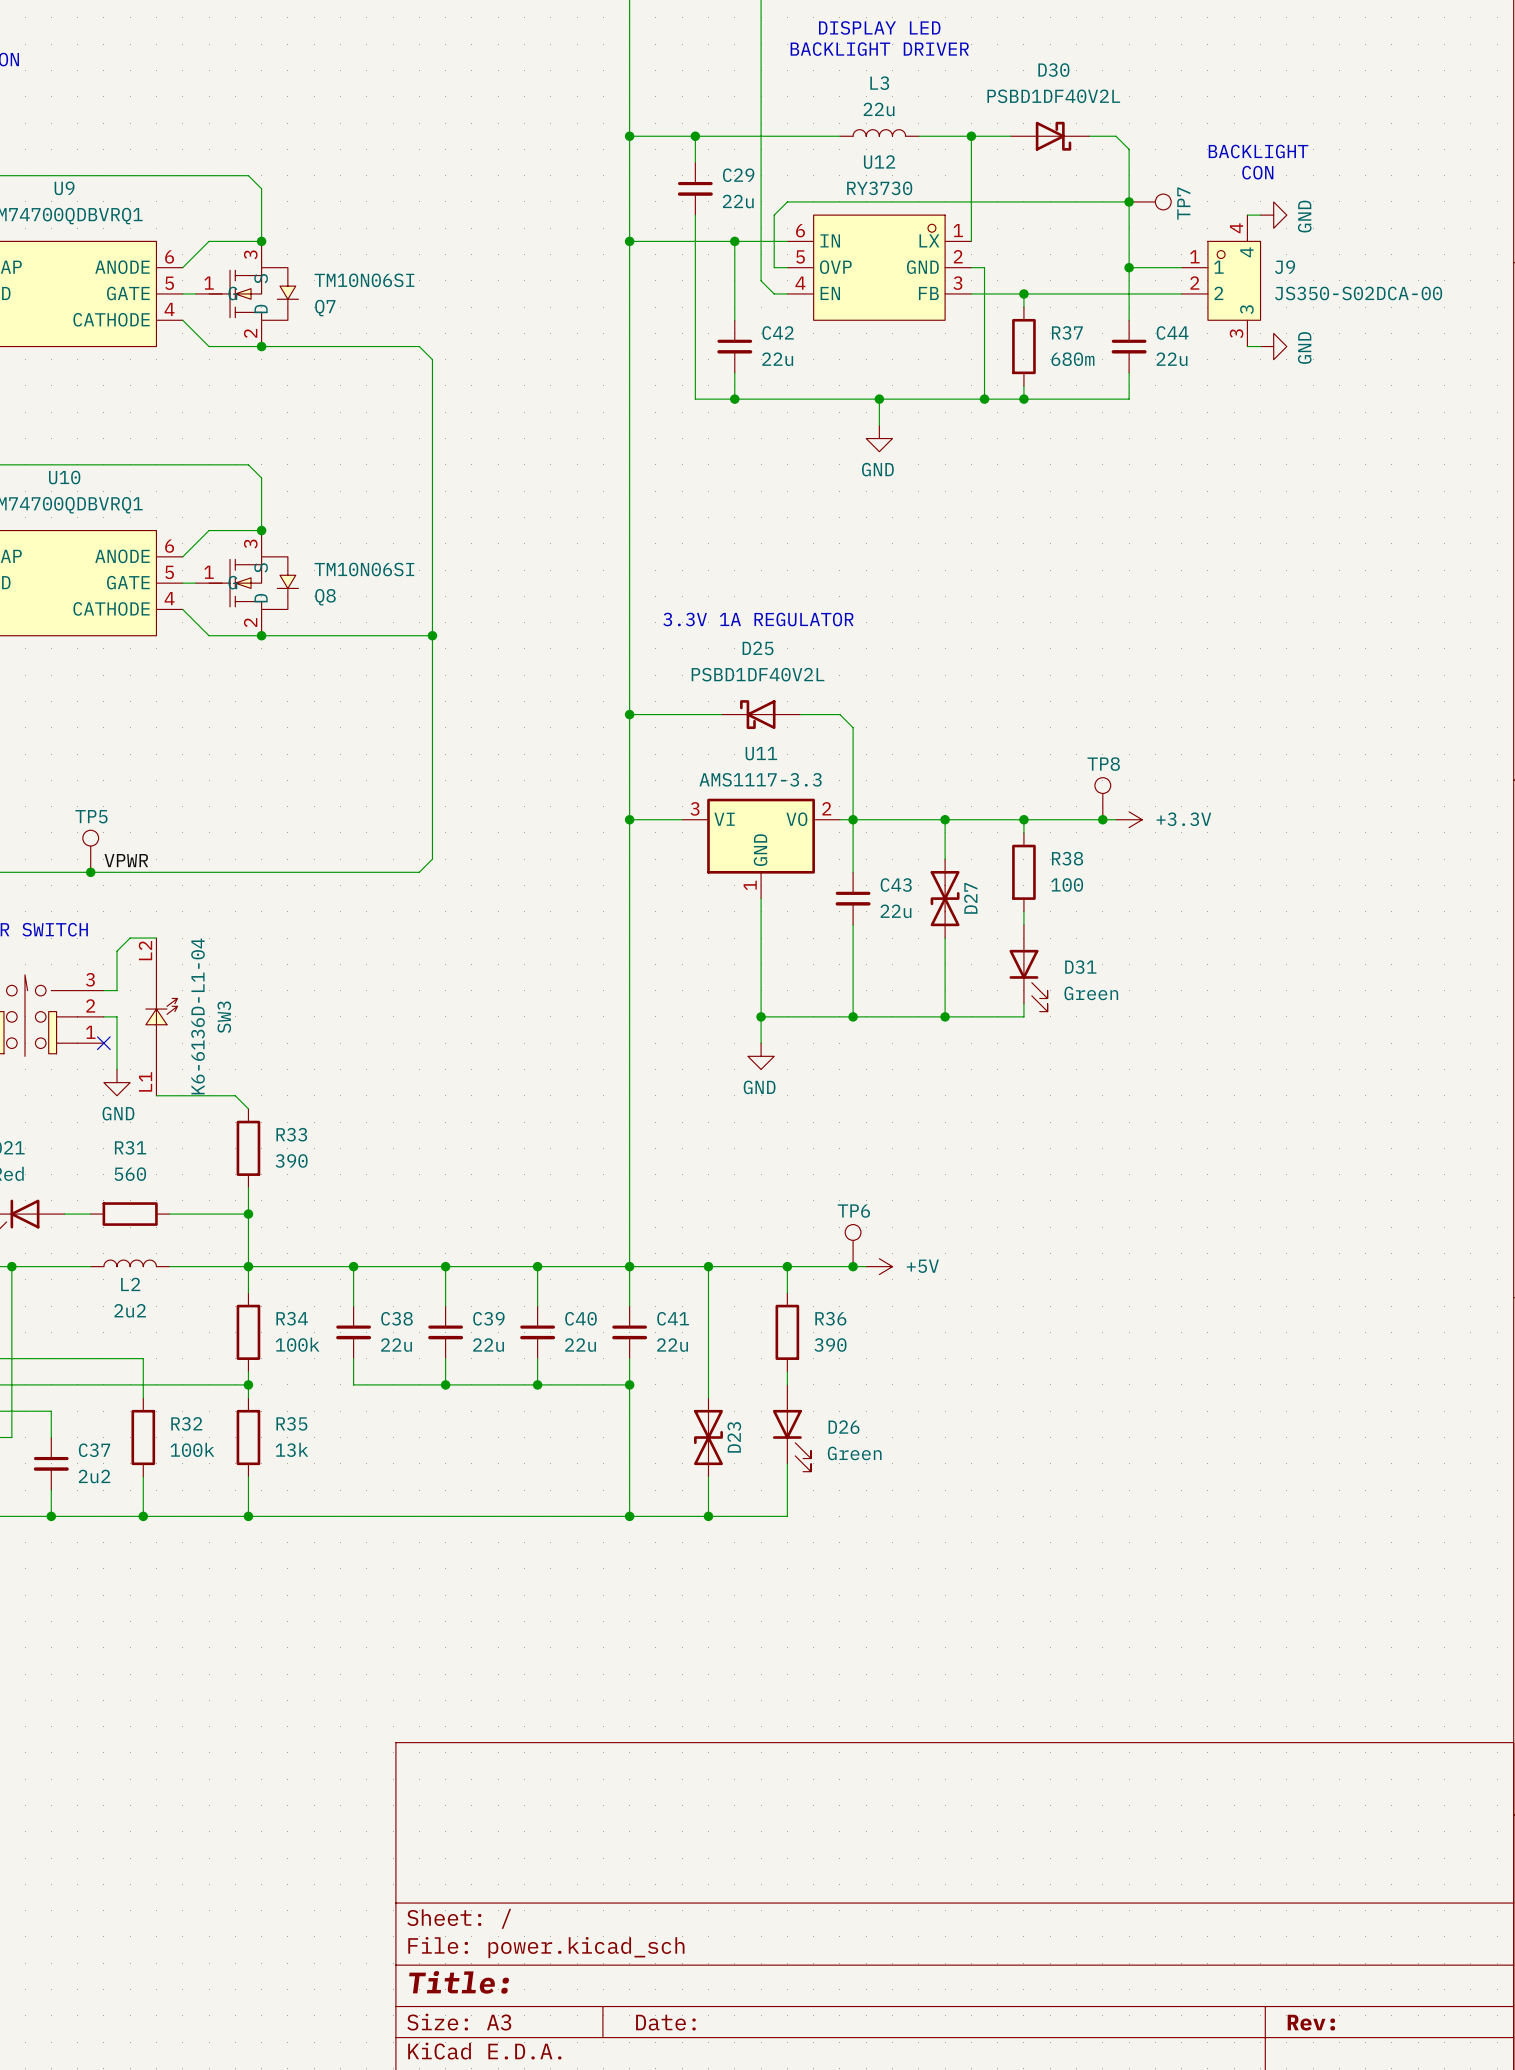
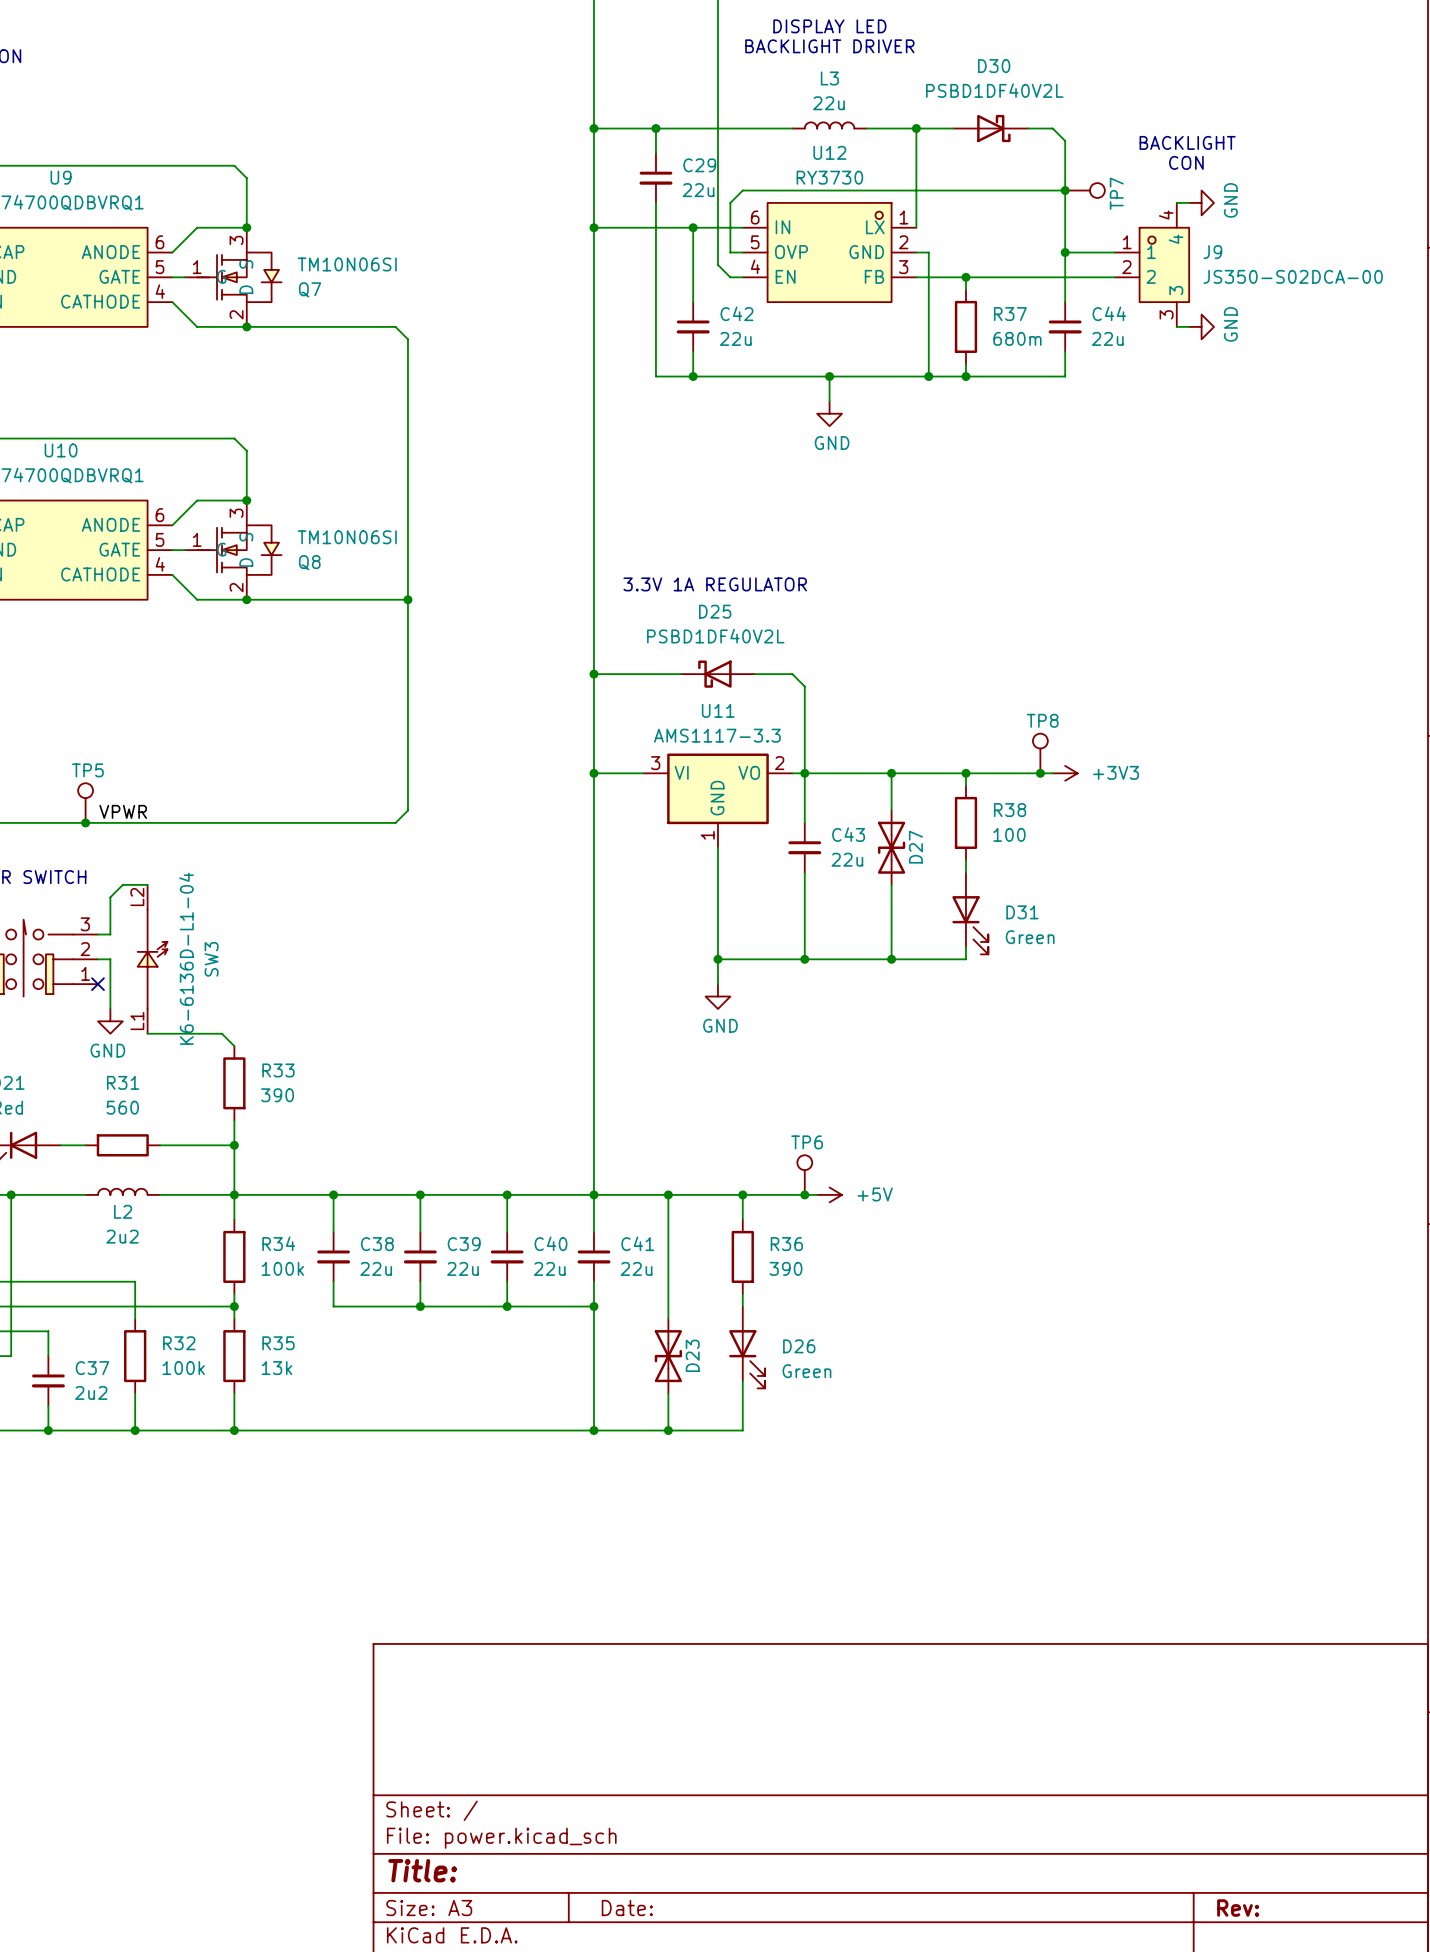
power symbol: +3.3V (1129, 819) -> +3V3 (1065, 773)

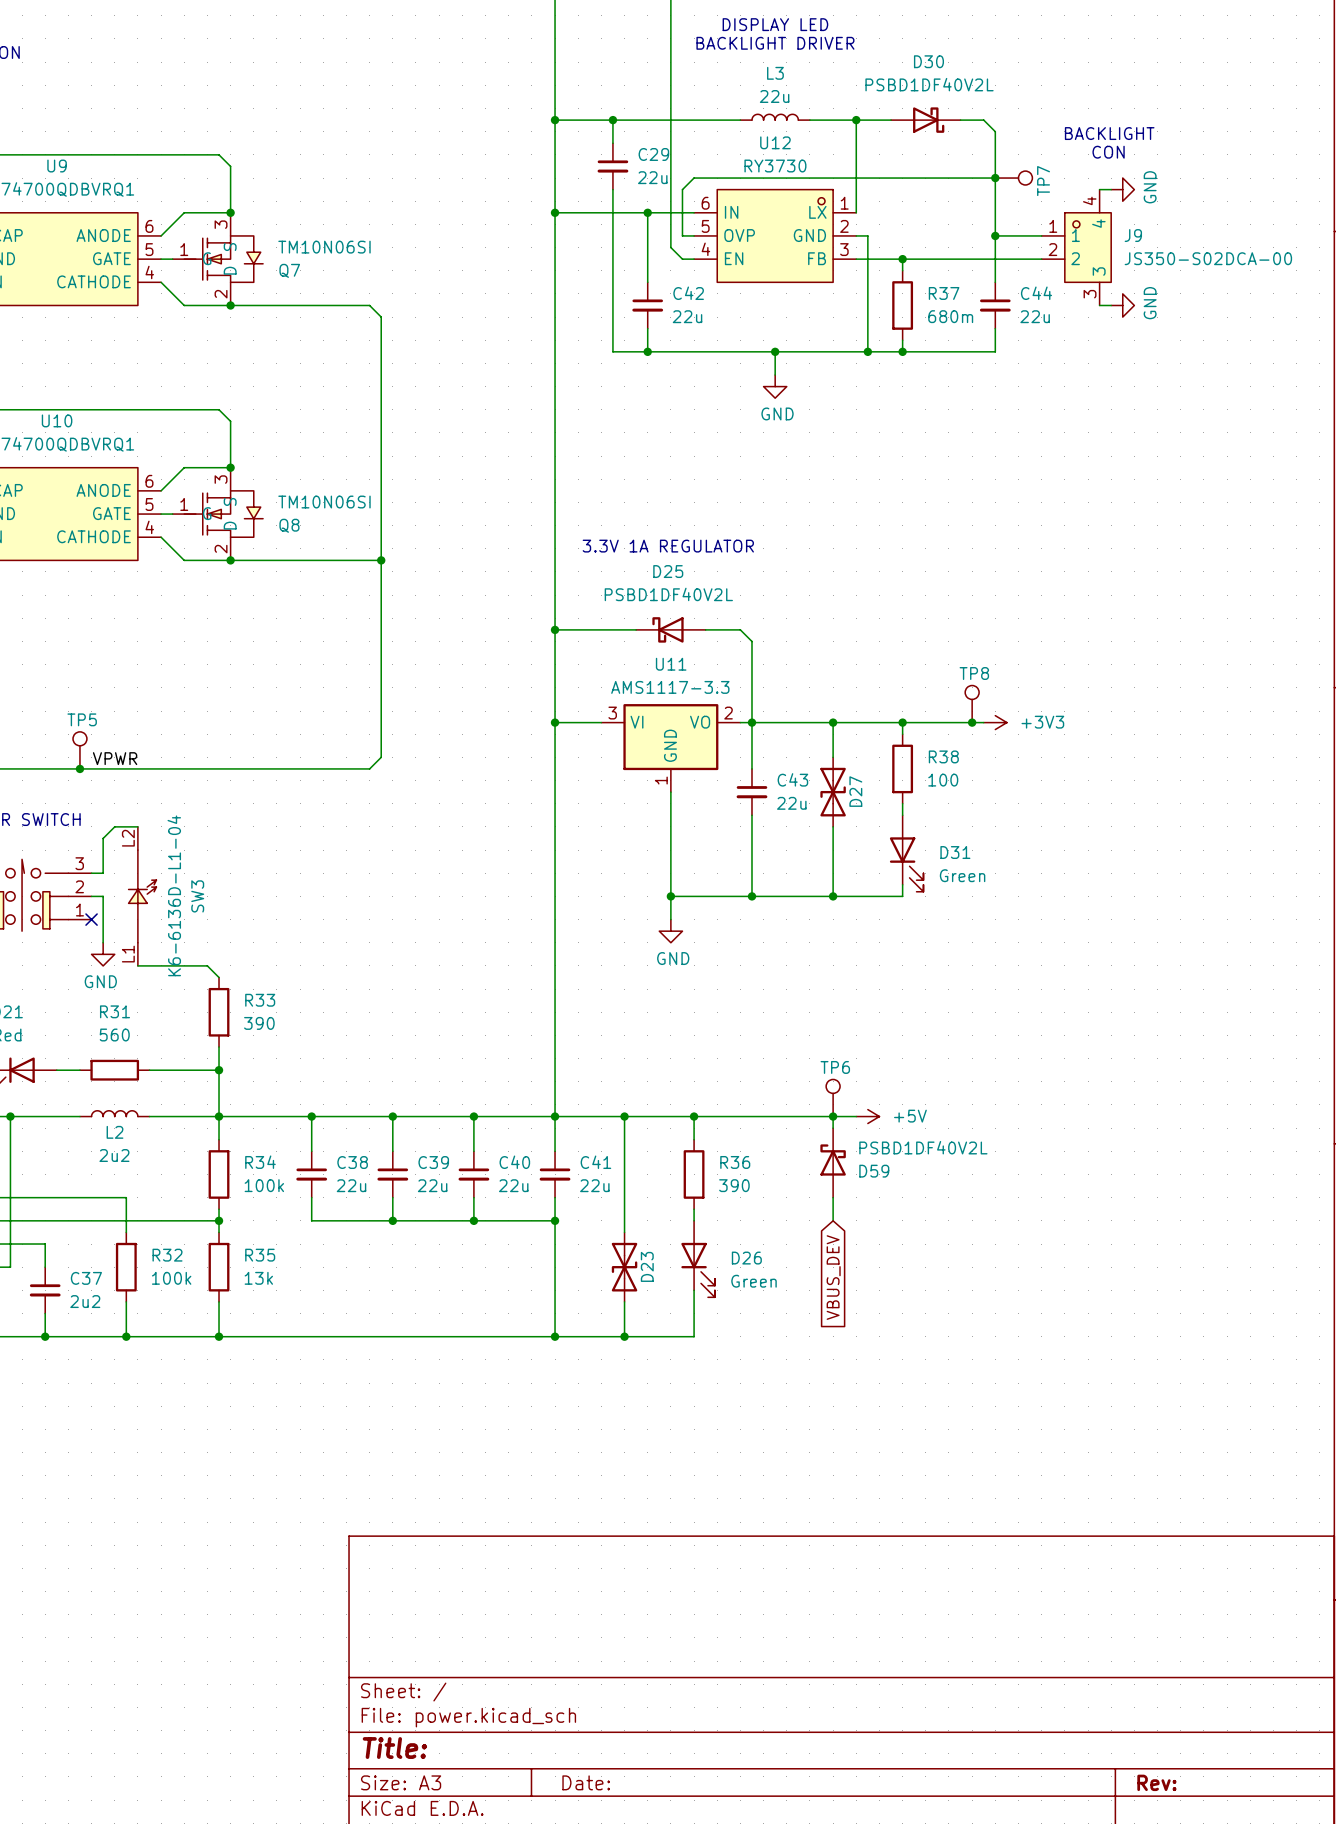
TP6 position: (804, 1175) -> (833, 1098)
junction: (804, 1194) -> none
wire: none -> (763, 1116) (856, 1116)
power symbol position: +5V (829, 1194) -> +5V (867, 1116)
wire: none -> (833, 1116) (833, 1128)
junction: none -> (833, 1116)
D59: none -> PSBD1DF40V2L (833, 1162)
wire: none -> (833, 1197) (833, 1220)
global label: none -> VBUS_DEV (833, 1277)

